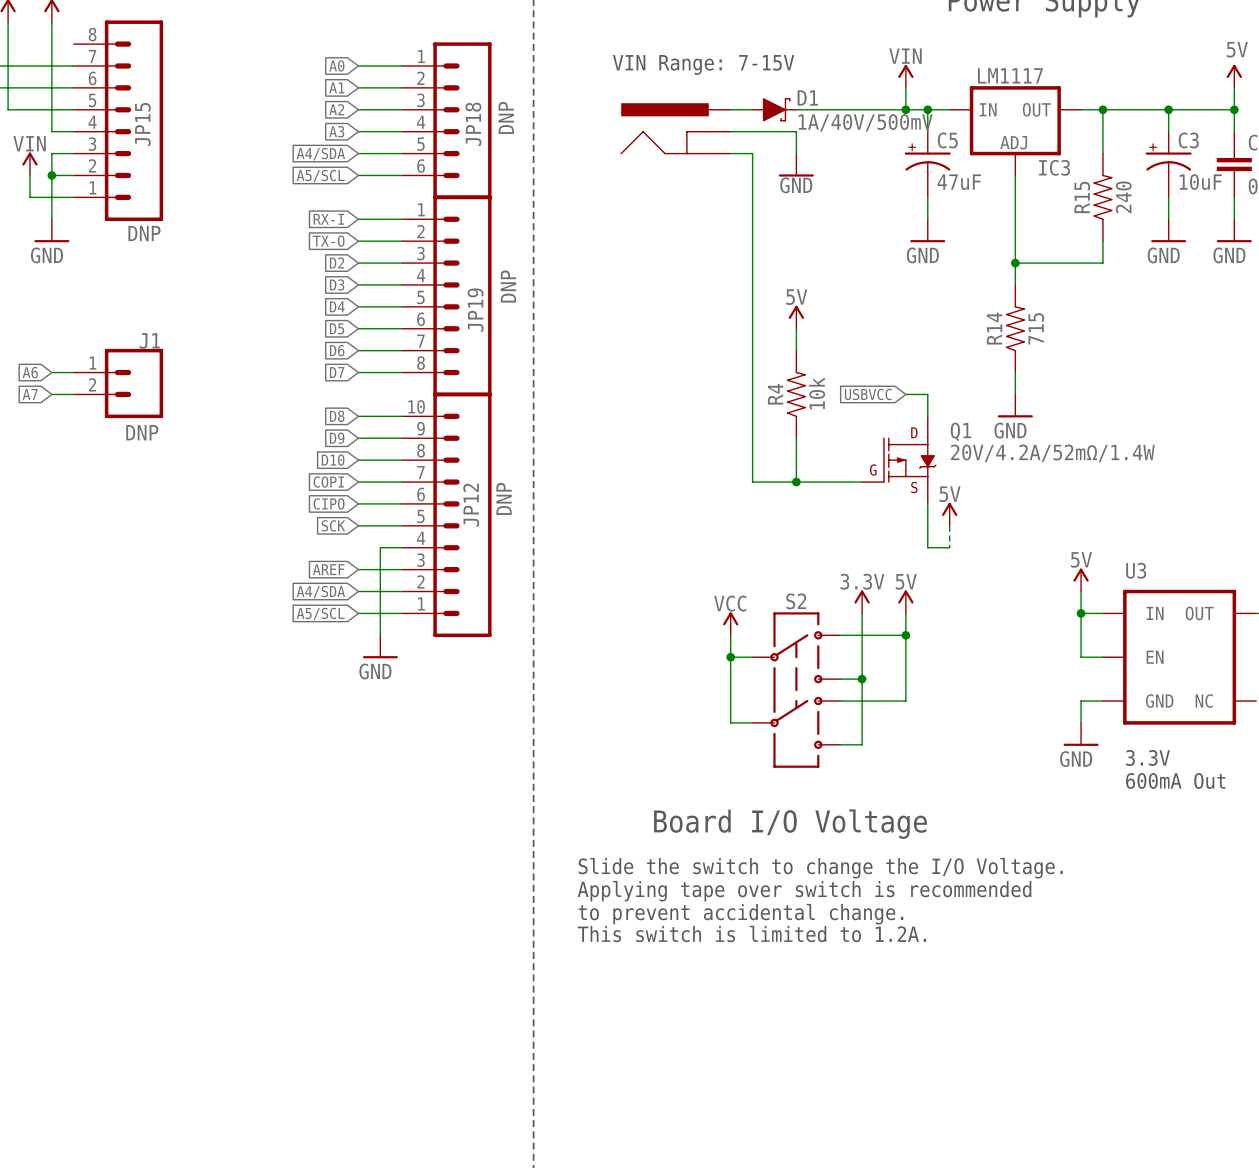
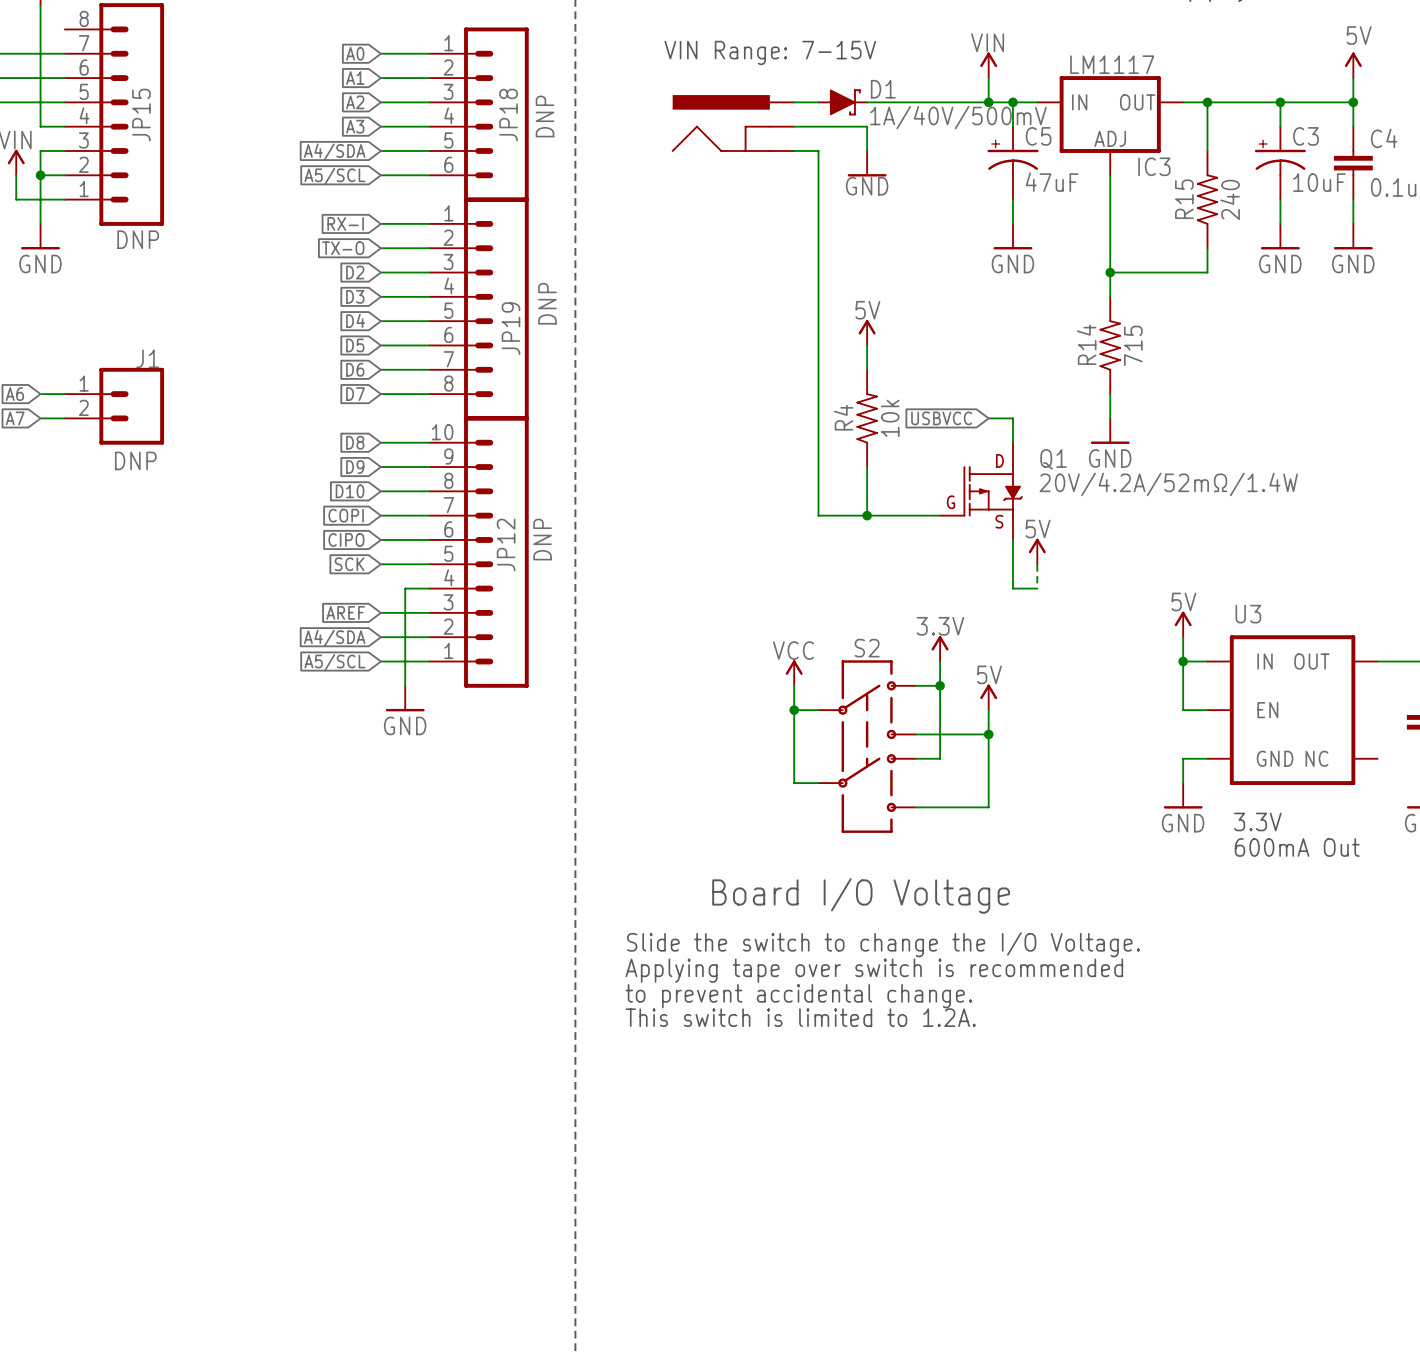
power symbol position: 5V (905, 601) -> 5V (988, 697)
wire: (862, 635) (905, 635) -> (940, 734) (988, 734)
junction: none -> (940, 685)
junction: (905, 635) -> none
junction: (862, 679) -> none
junction: none -> (988, 734)
wire: (905, 701) (862, 701) (862, 744) -> (988, 758) (988, 807) (940, 807)

